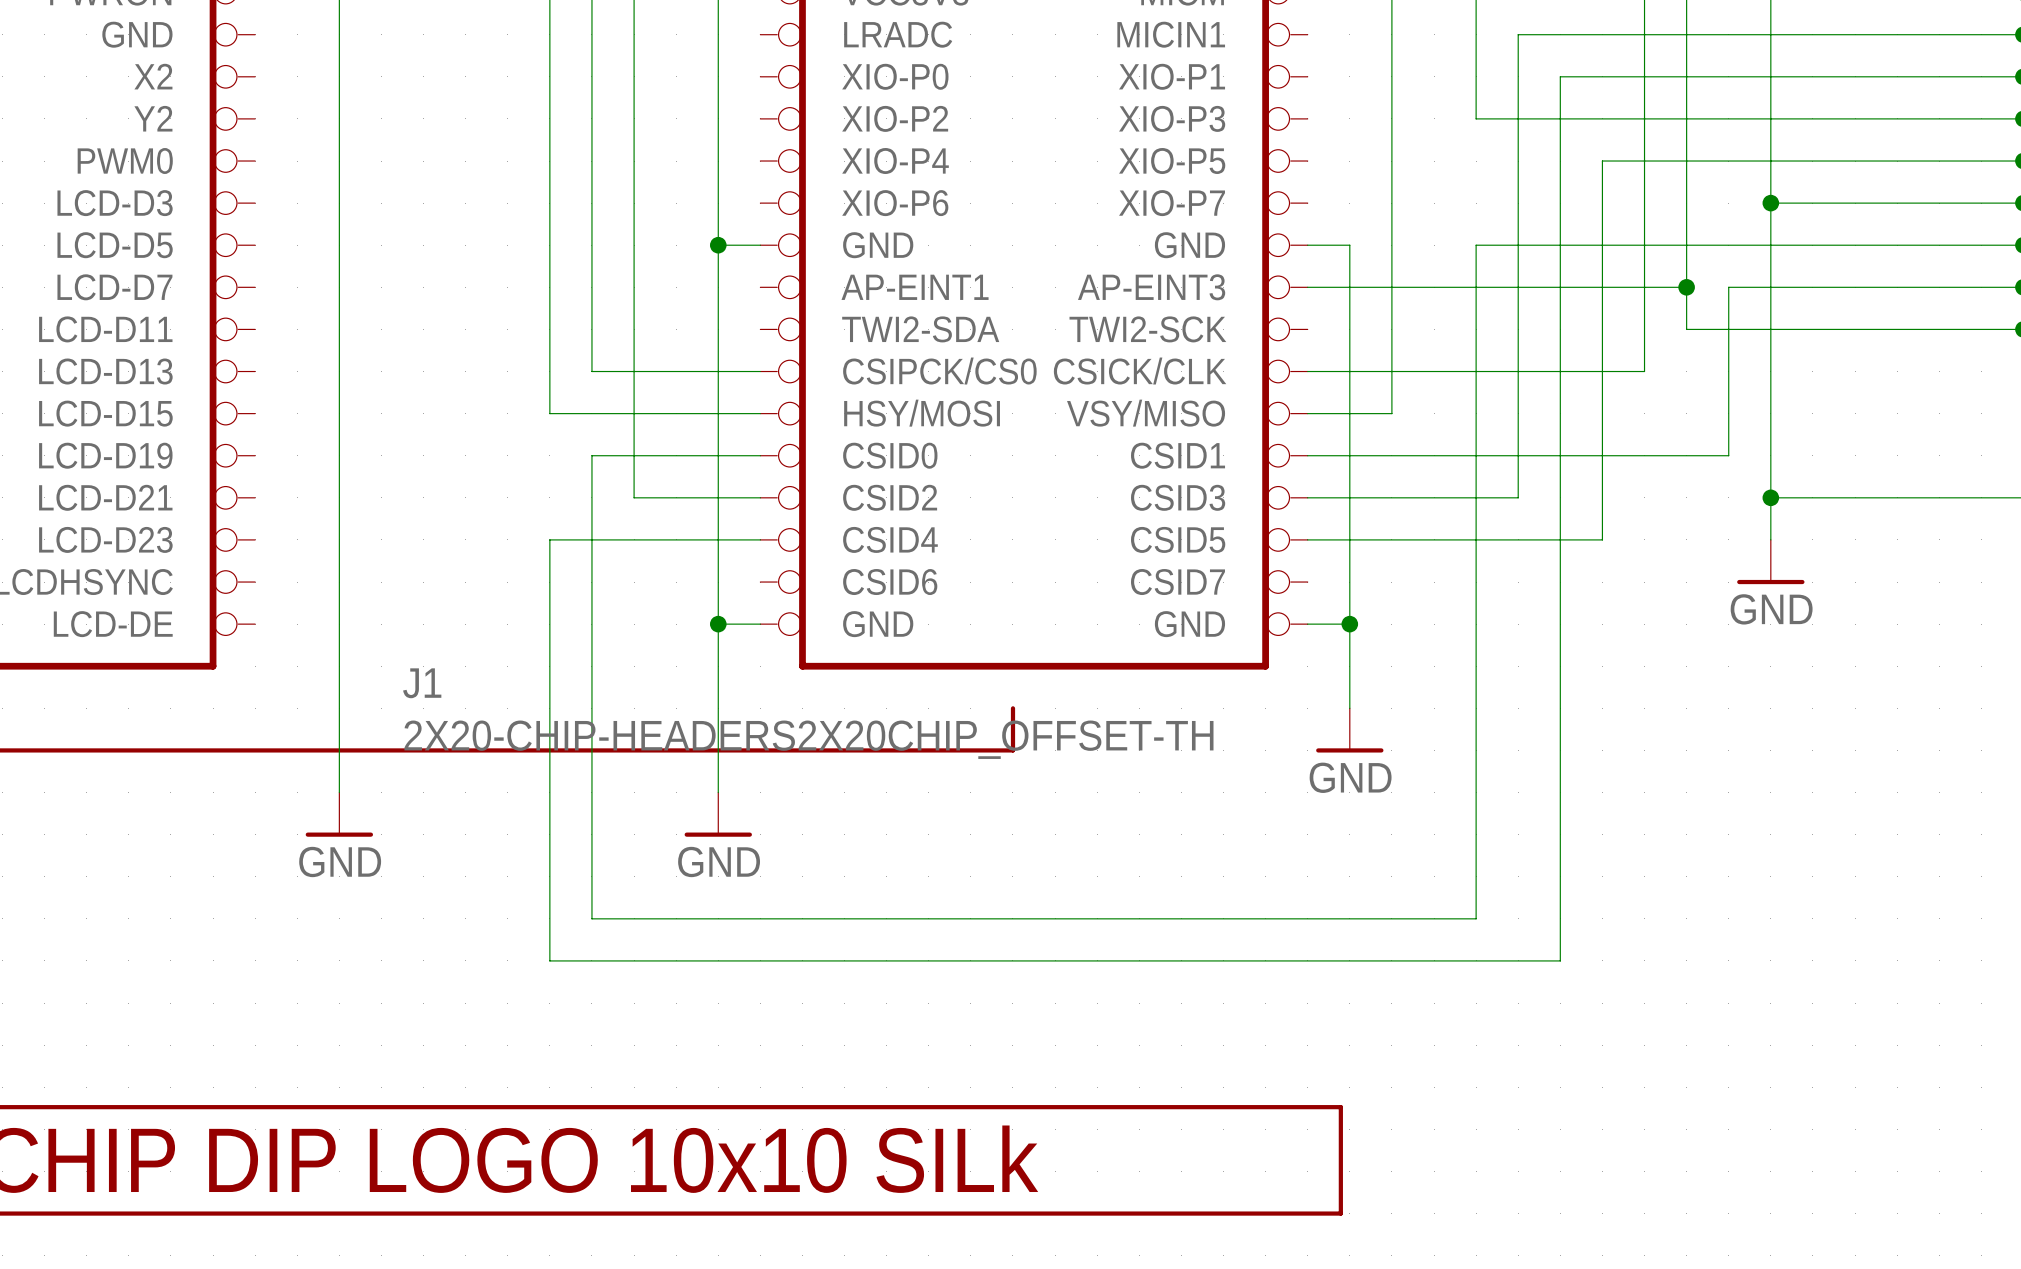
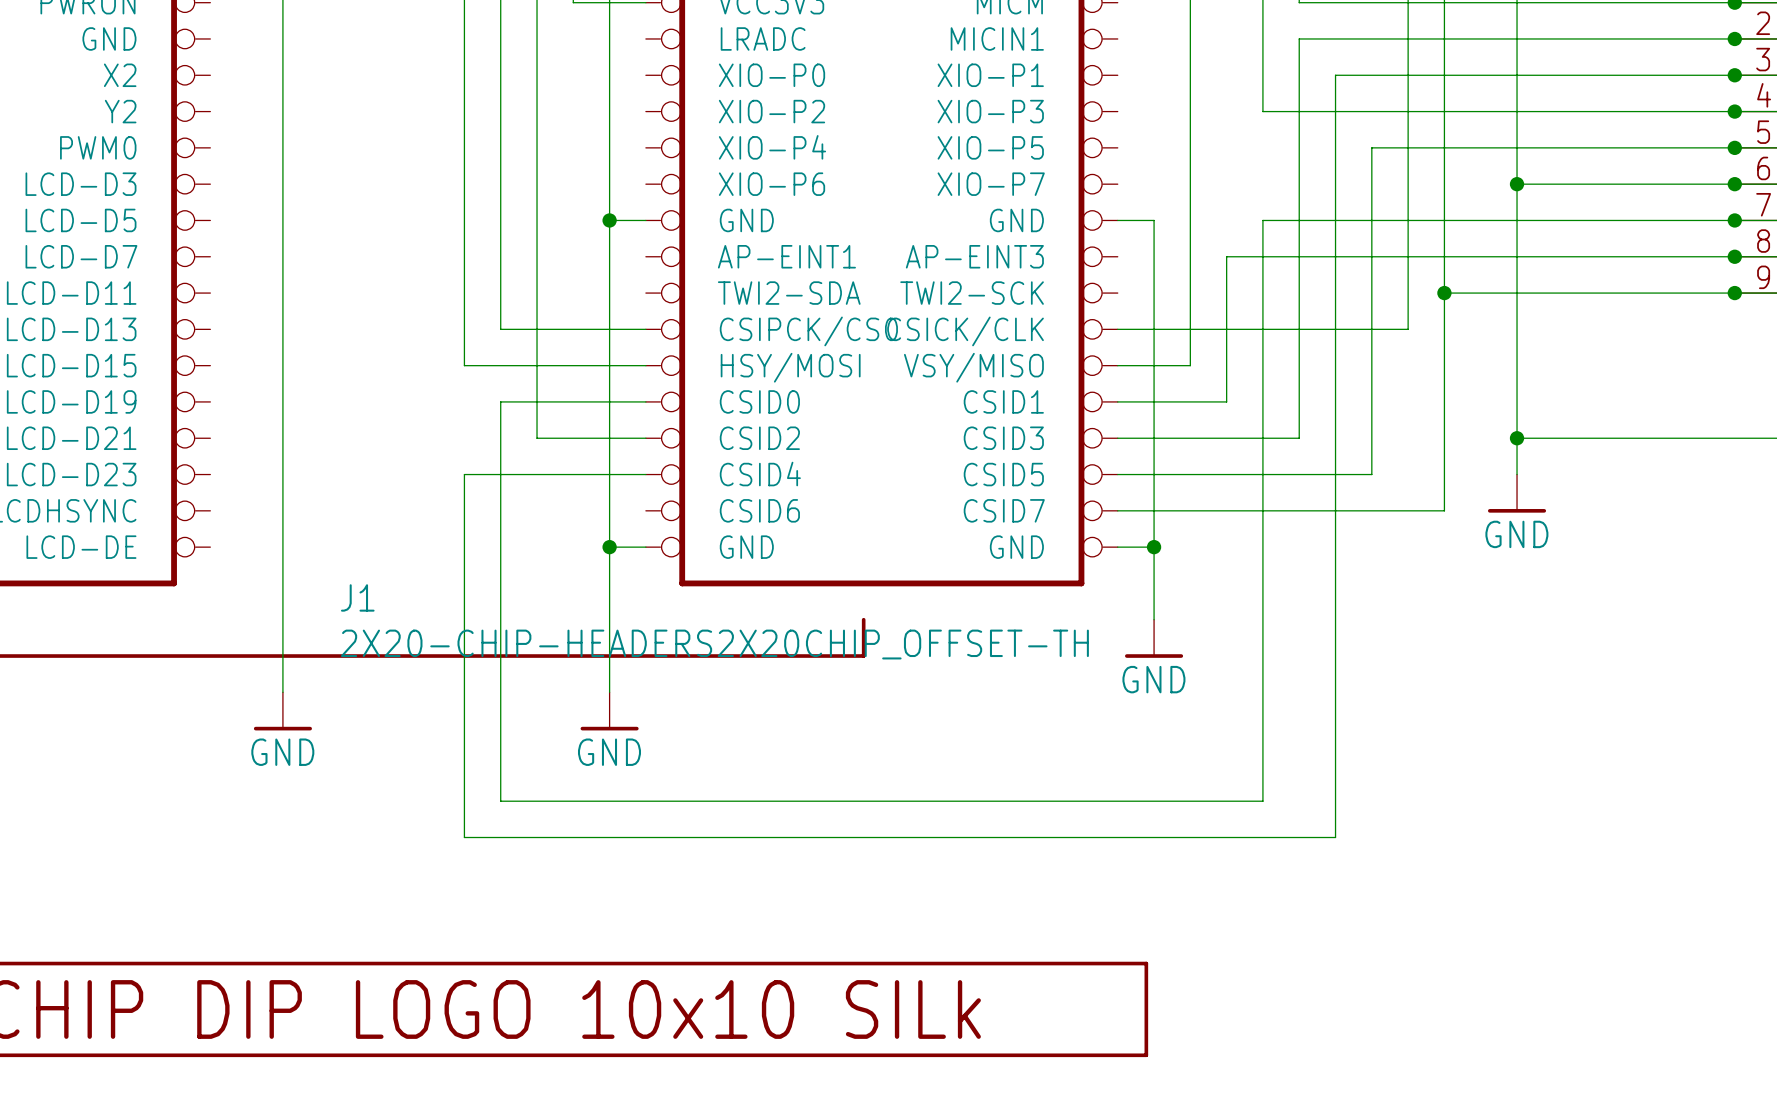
wire: (1307, 287) (1434, 287) -> (1226, 401) (1226, 256)
junction position: (1686, 287) -> (1444, 293)
wire: (1728, 287) (1728, 455) (1434, 455) -> (1480, 256) (1444, 256)
wire: none -> (1444, 293) (1444, 510) (1117, 510)

